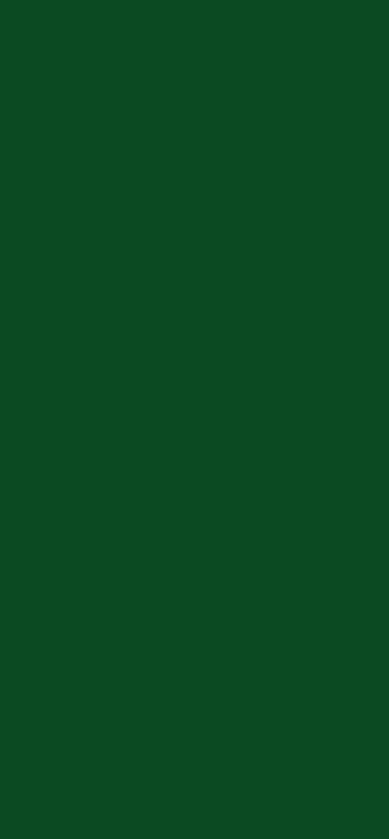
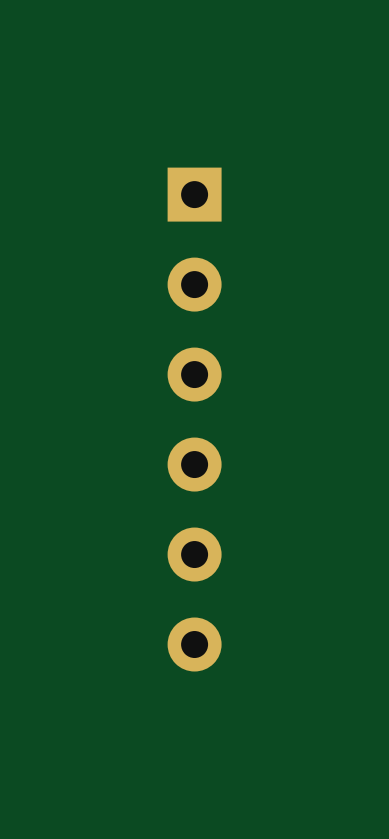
part: none -> (194, 419)

